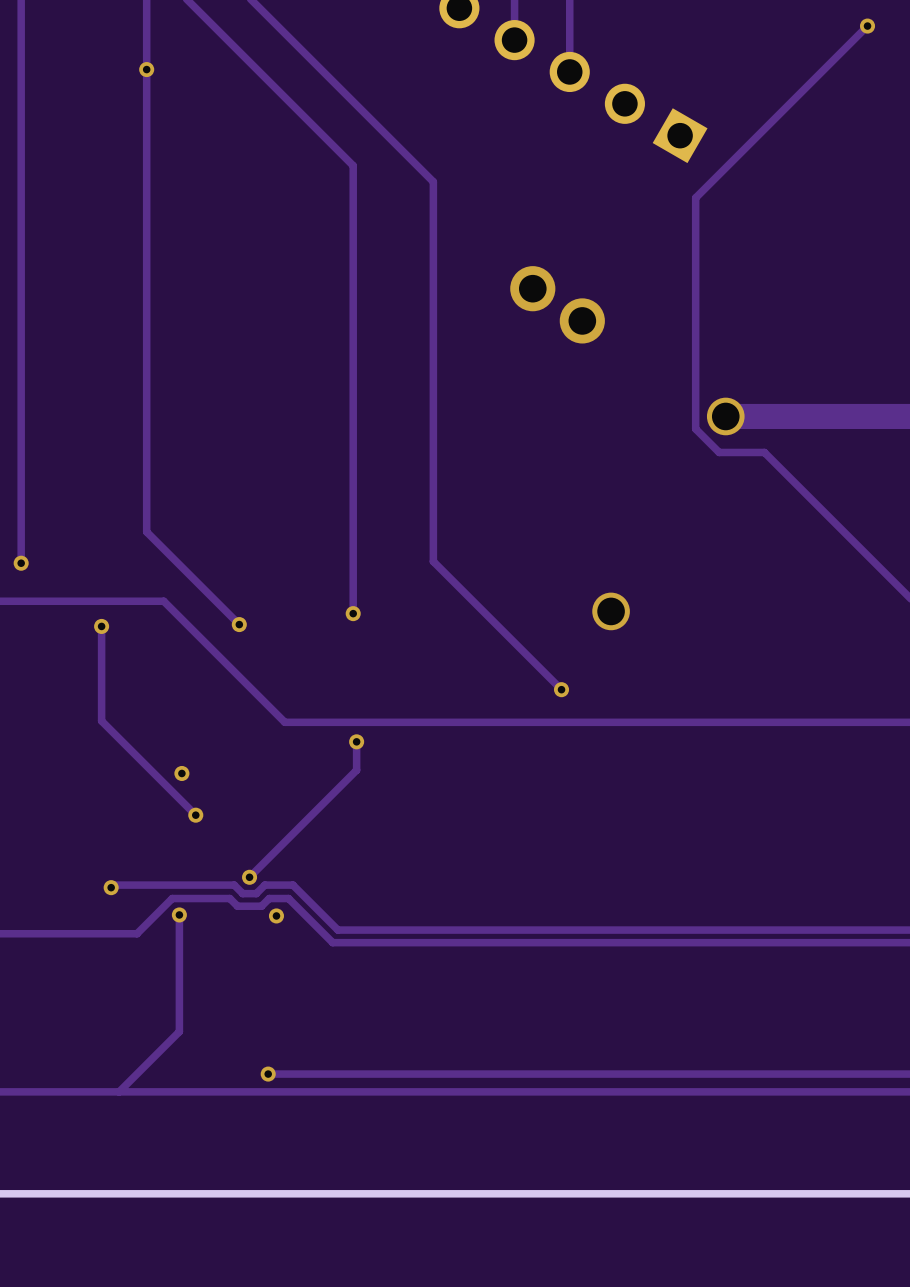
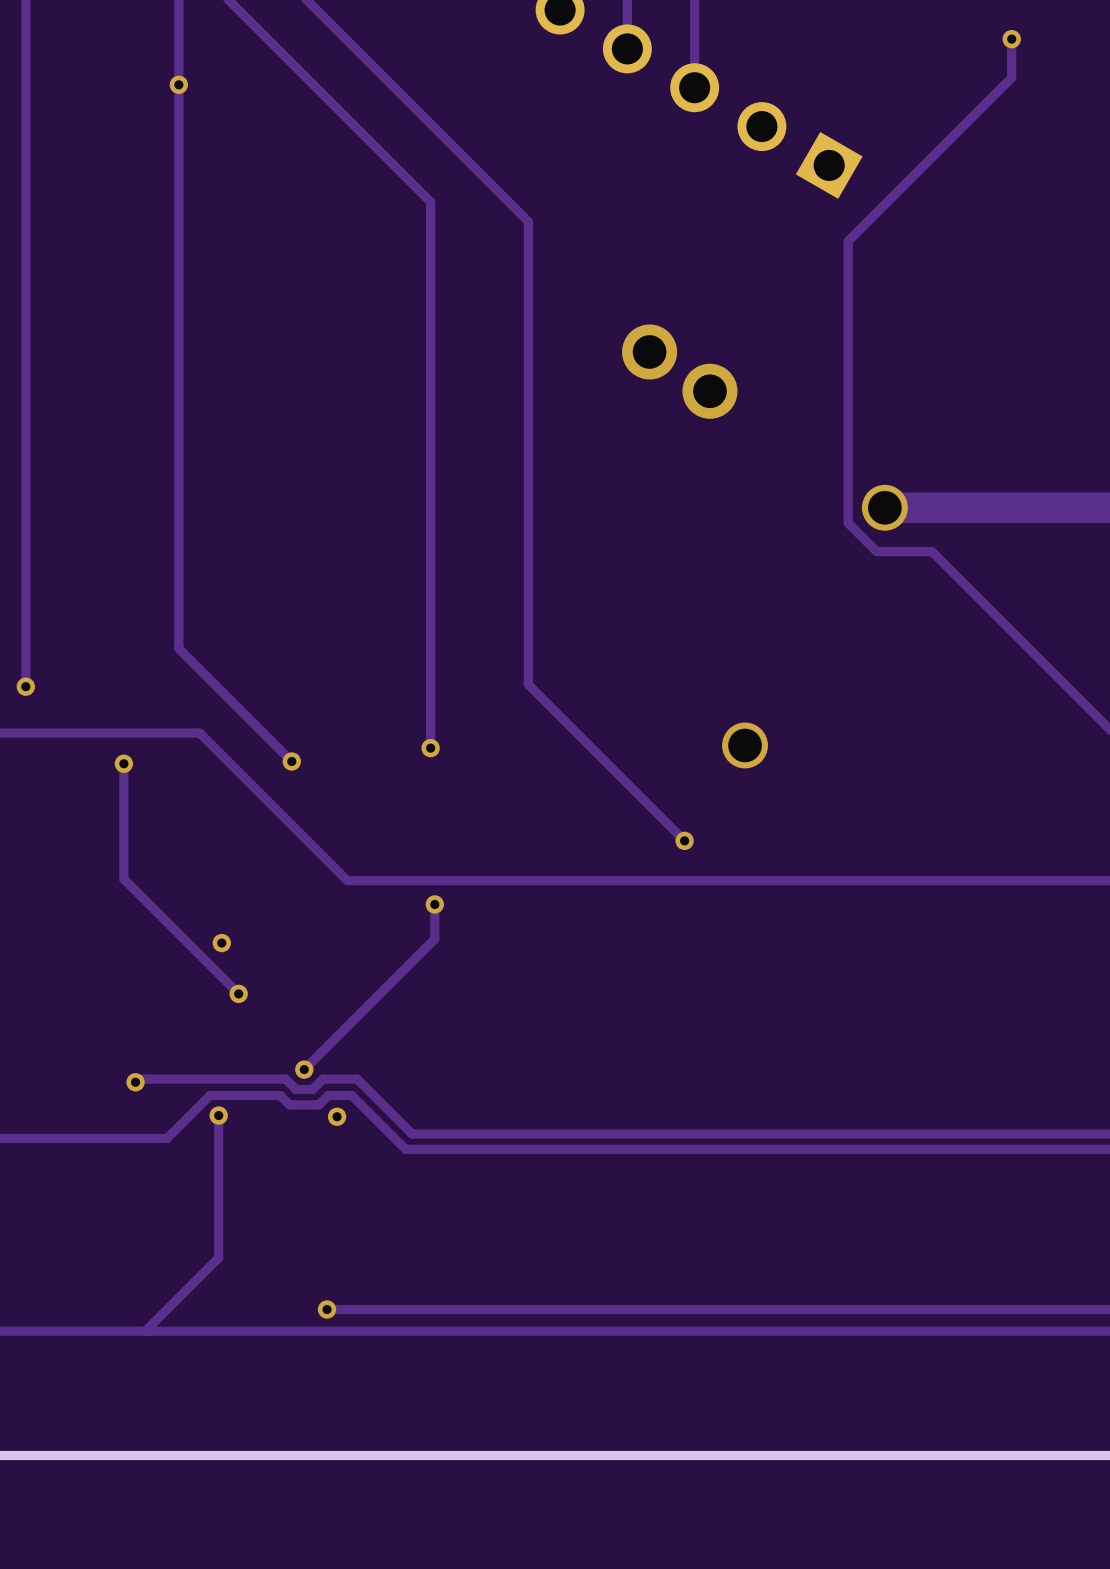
track: (867, 26) (829, 63) -> (1011, 39) (1011, 77)
via position: (867, 26) -> (1011, 39)

